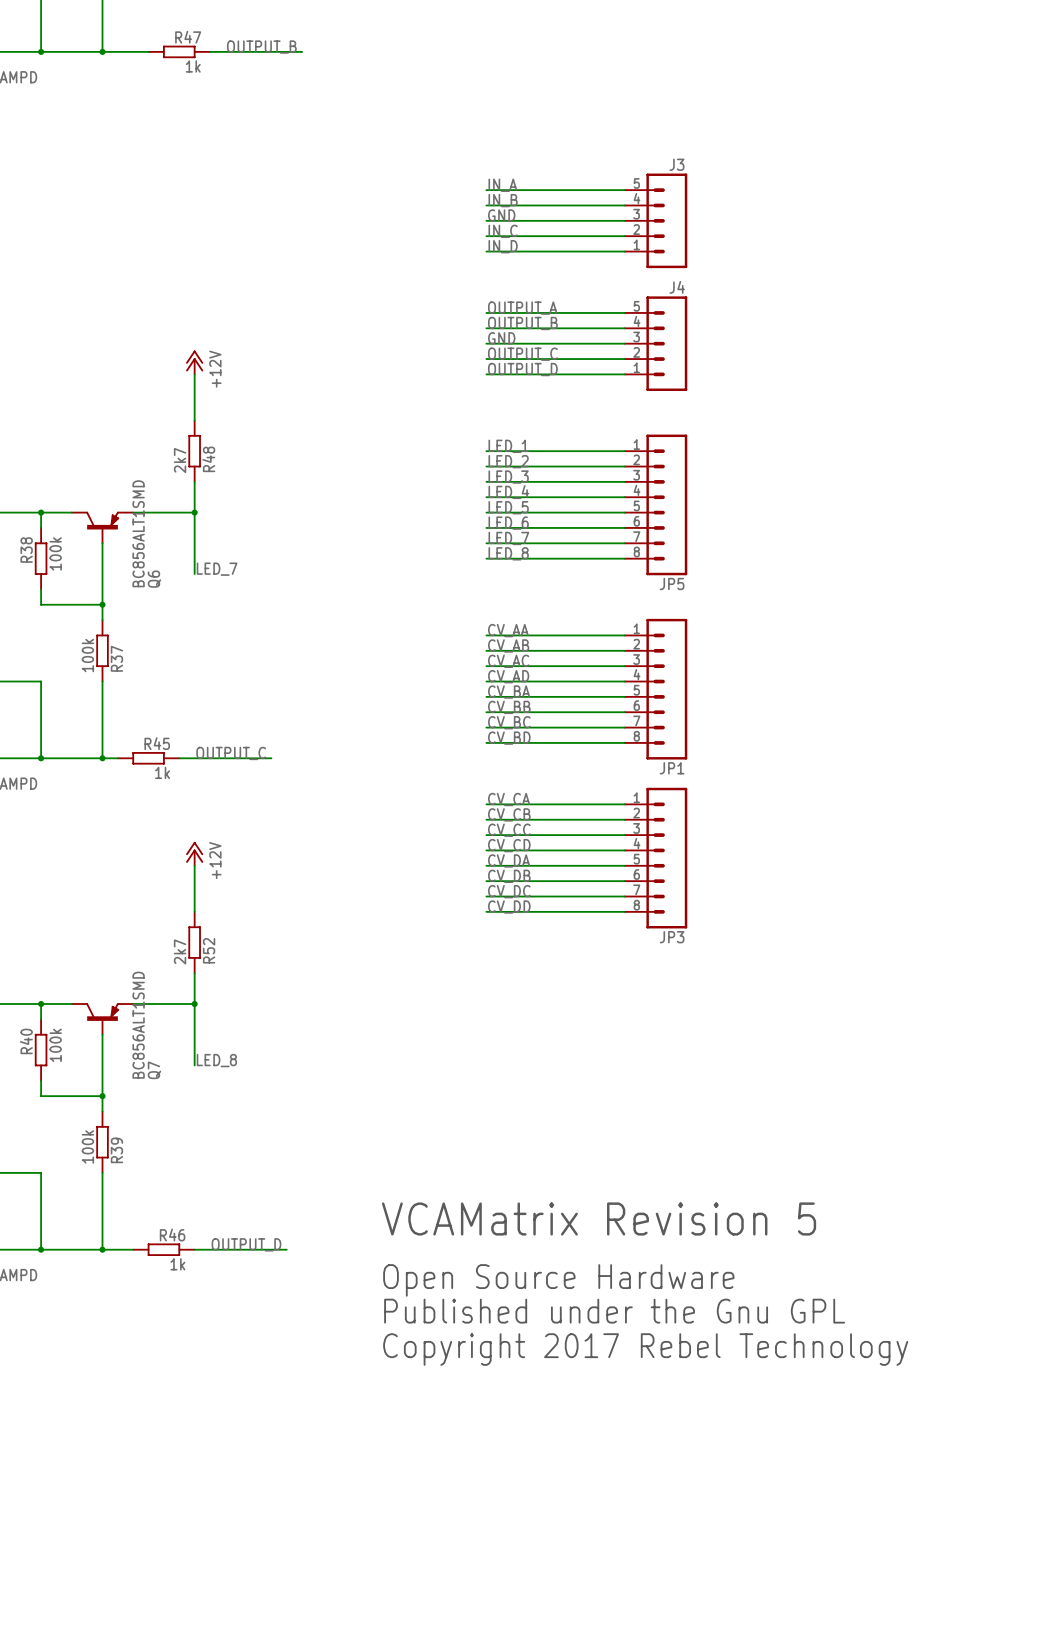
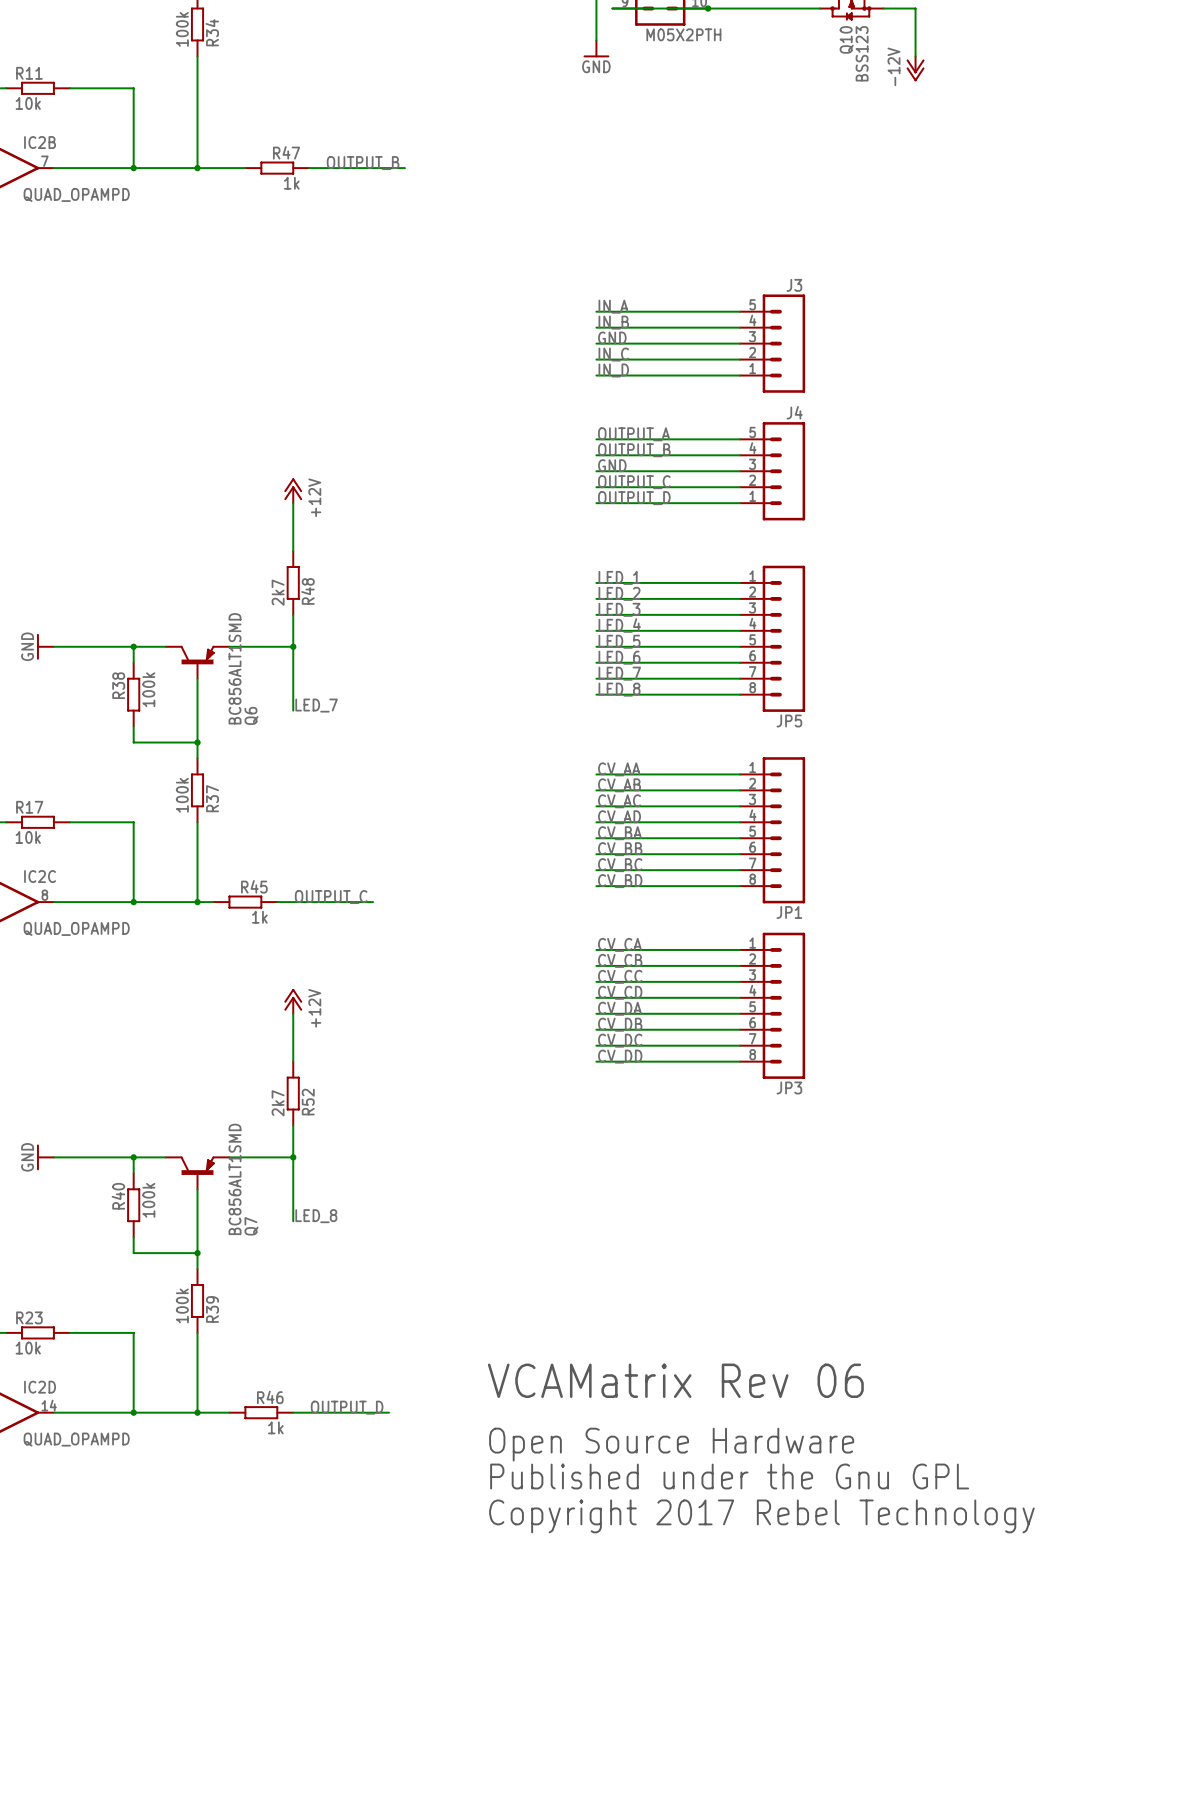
text: VCAMatrix Revision 5 (599, 1218) -> VCAMatrix Rev 06 (675, 1380)

